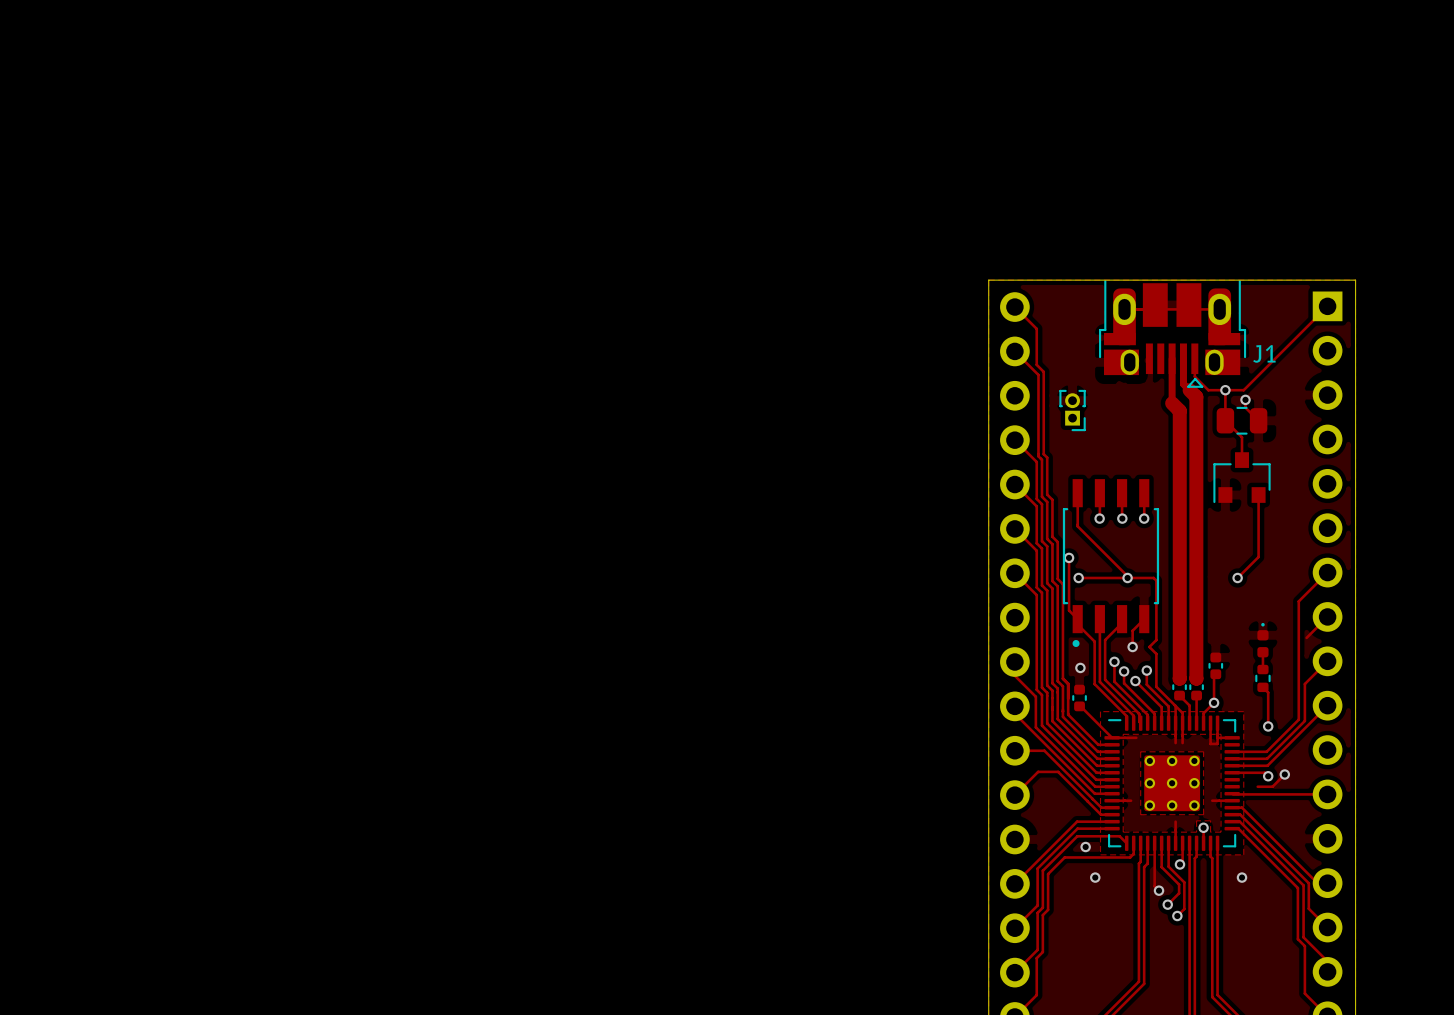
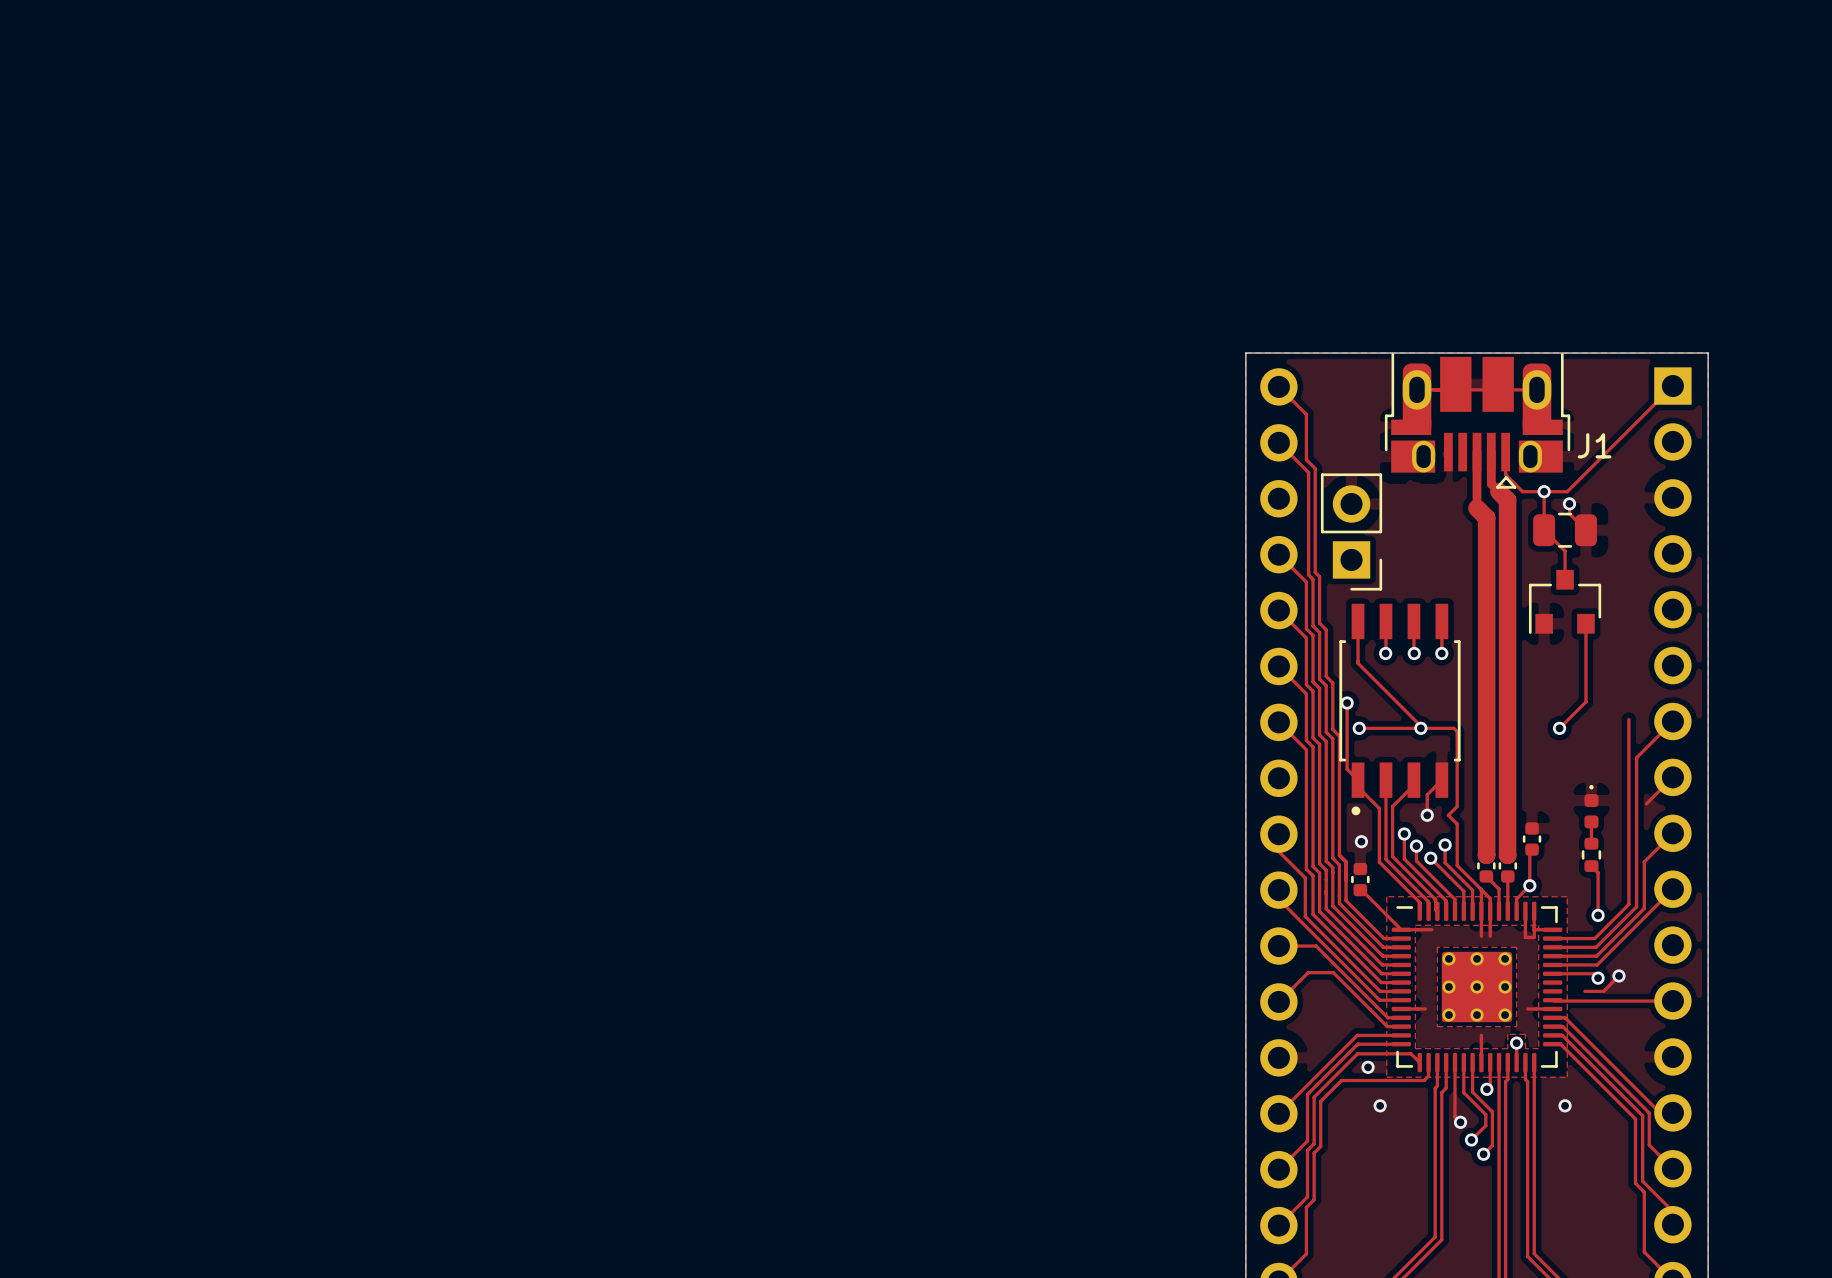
part footprint: [1059, 389, 1086, 432] -> [1320, 473, 1383, 591]
track: none -> (1628, 719) (1628, 904) (1594, 938) (1552, 938)

